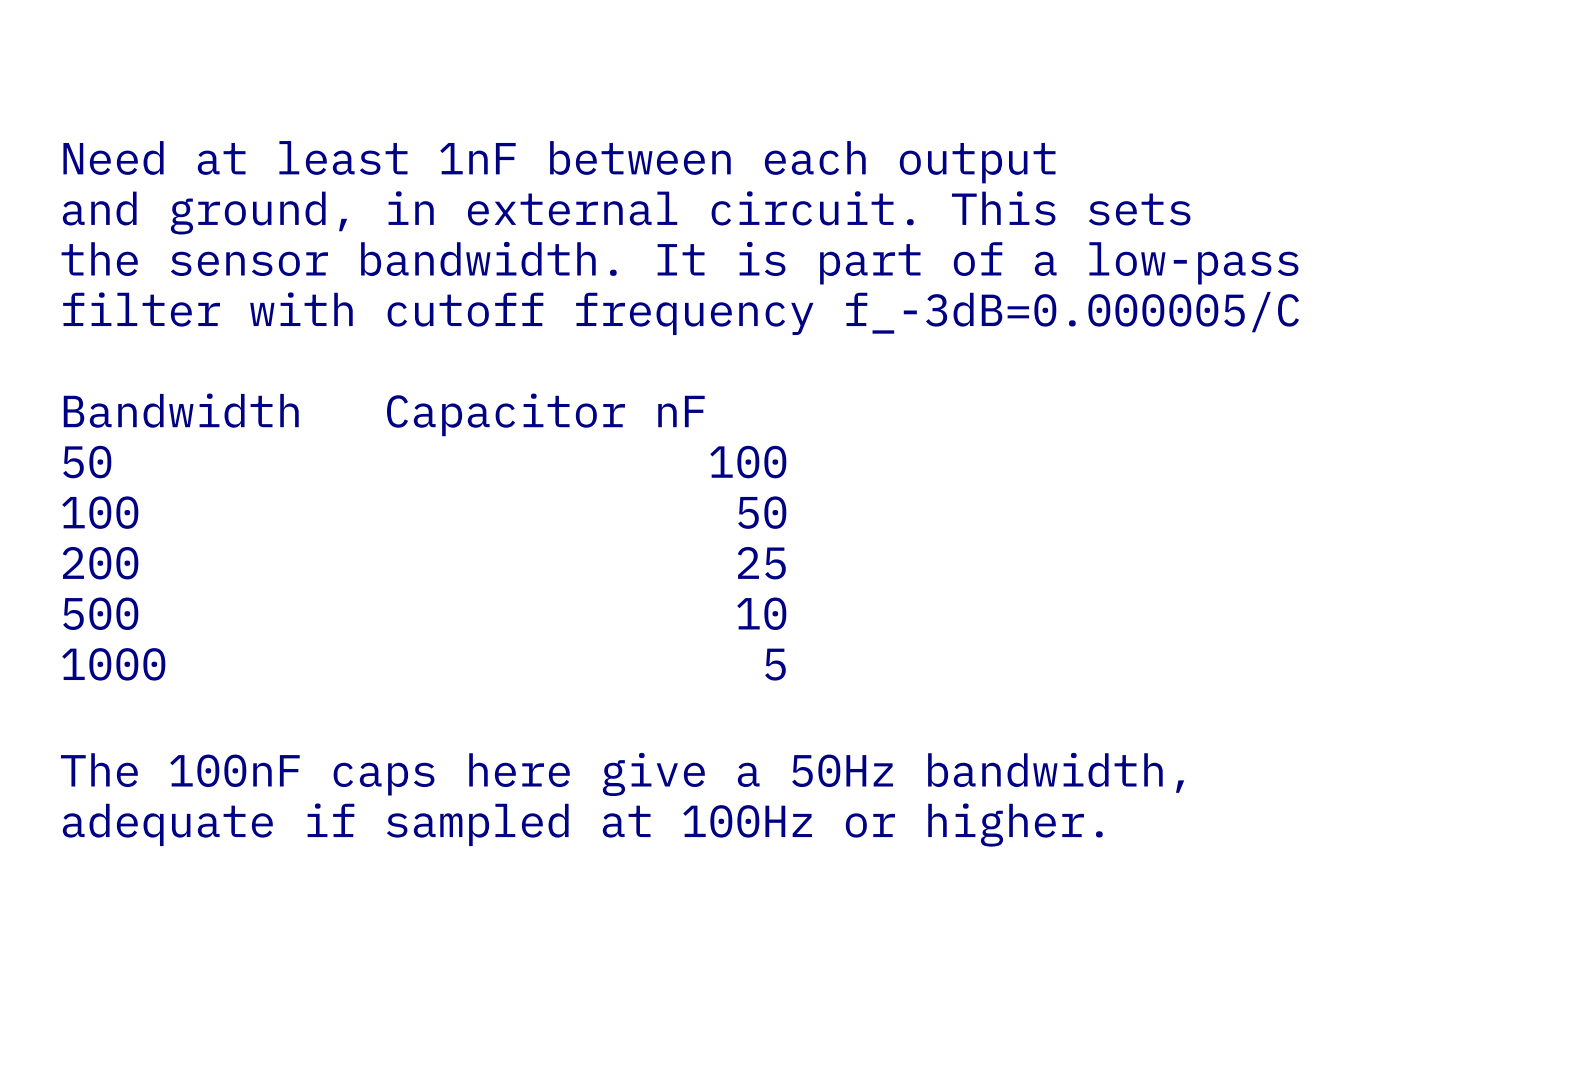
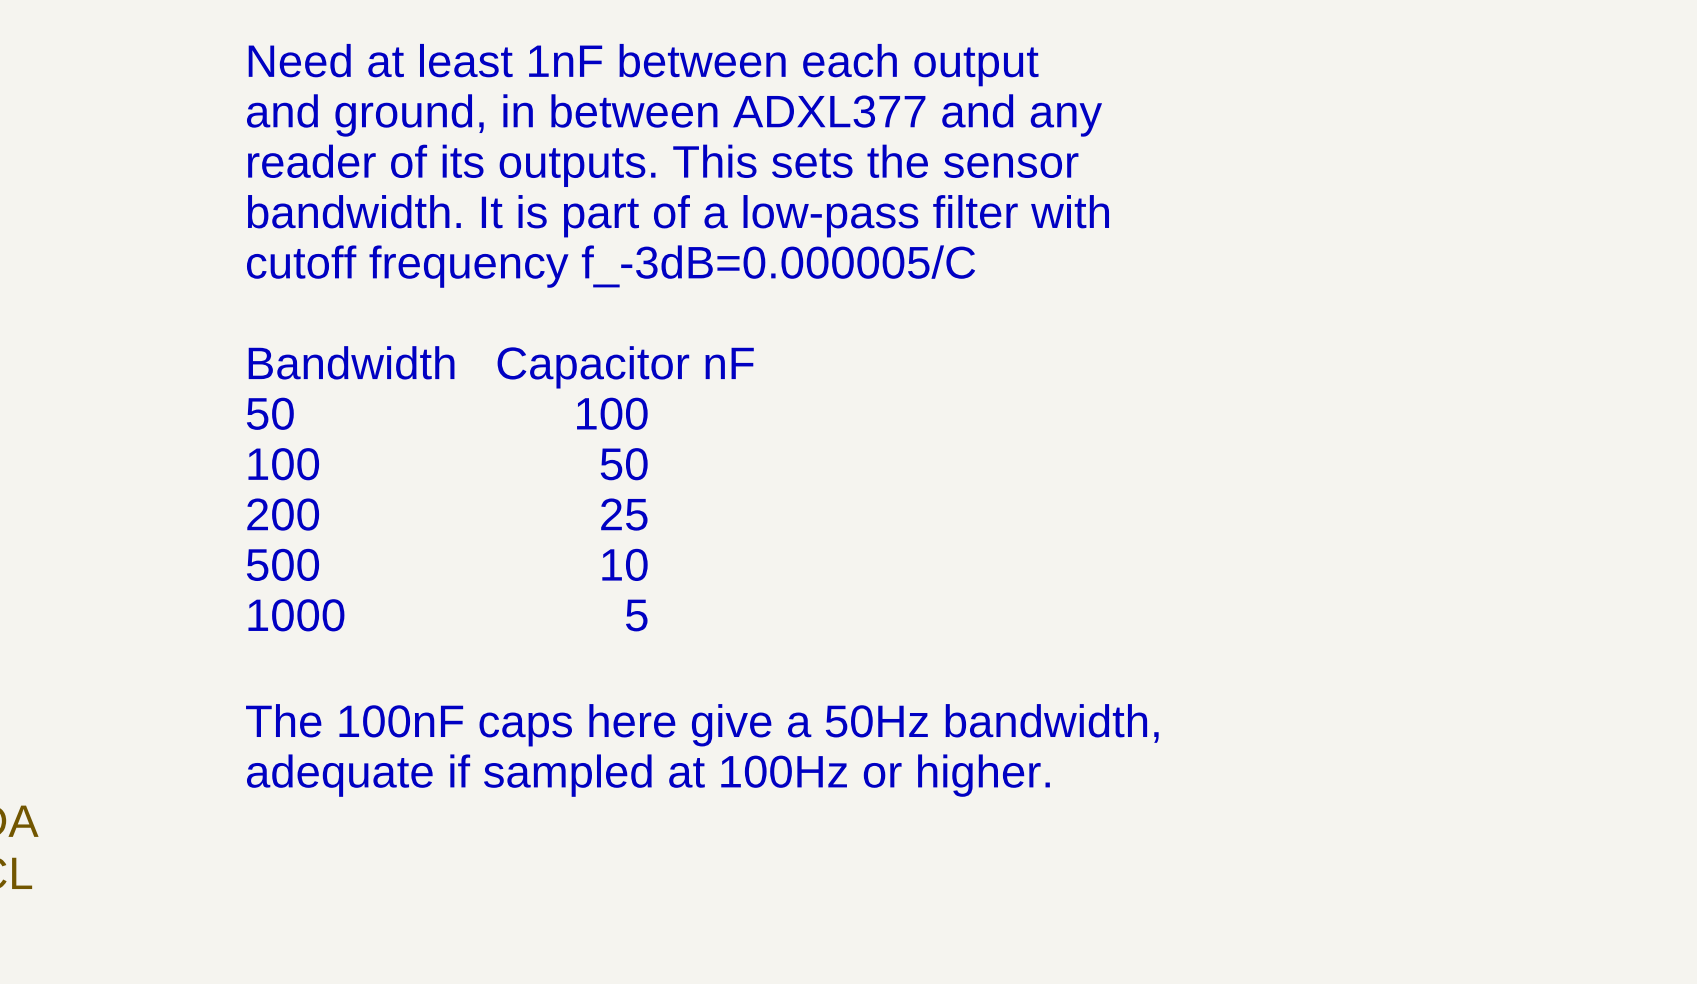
text: none -> Need at least 1nF between each output (643, 65)
text: Need at least 1nF between each output (559, 162) -> and ground, in between ADXL377 and any (674, 115)
text: and ground, in external circuit. This sets (626, 212) -> reader of its outputs. This sets the sensor (663, 165)
text: the sensor bandwidth. It is part of a low-pass (680, 263) -> bandwidth. It is part of a low-pass filter with (678, 216)
text: filter with cutoff frequency f_-3dB=0.000005/C (681, 313) -> cutoff frequency f_-3dB=0.000005/C (611, 266)

